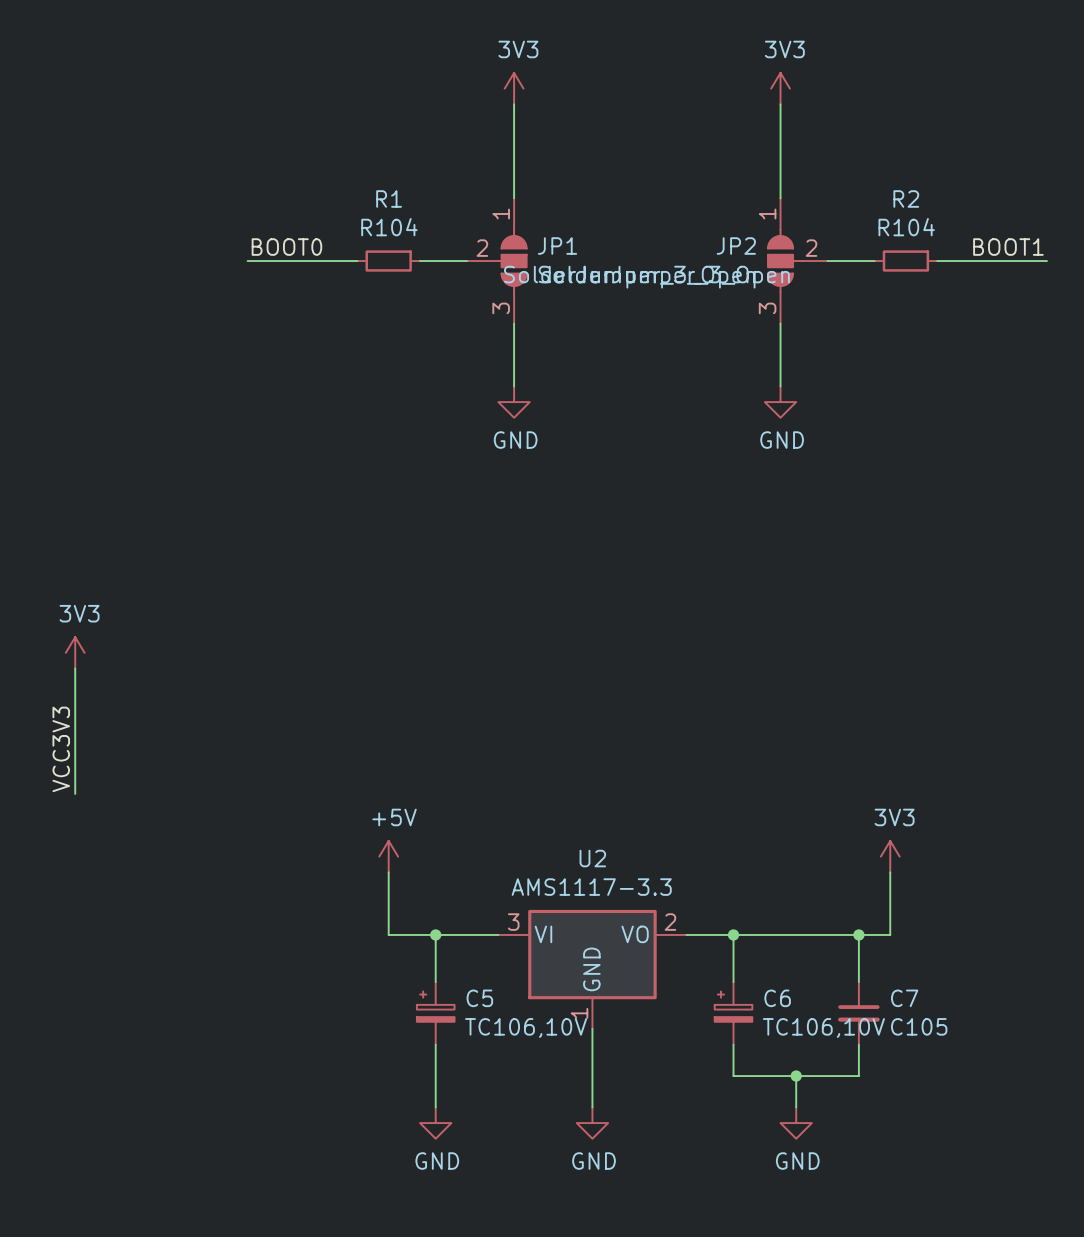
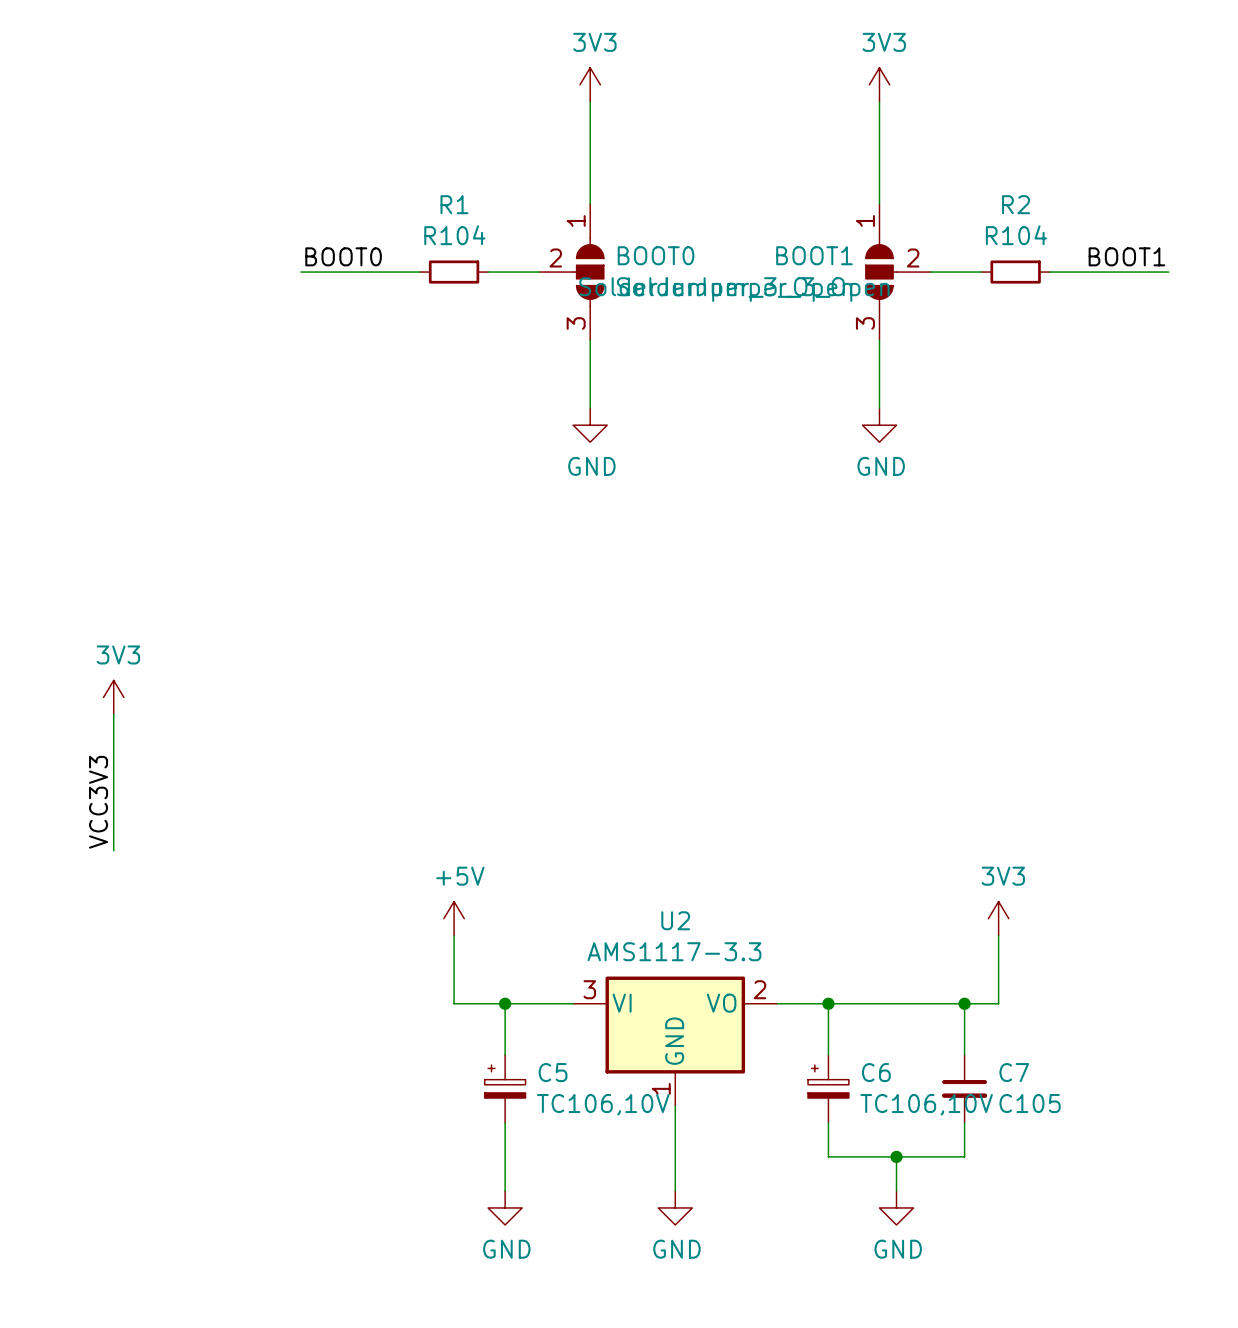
JP1 name: JP1 (557, 246) -> BOOT0 (656, 255)
JP2 name: JP2 (736, 246) -> BOOT1 (814, 255)

